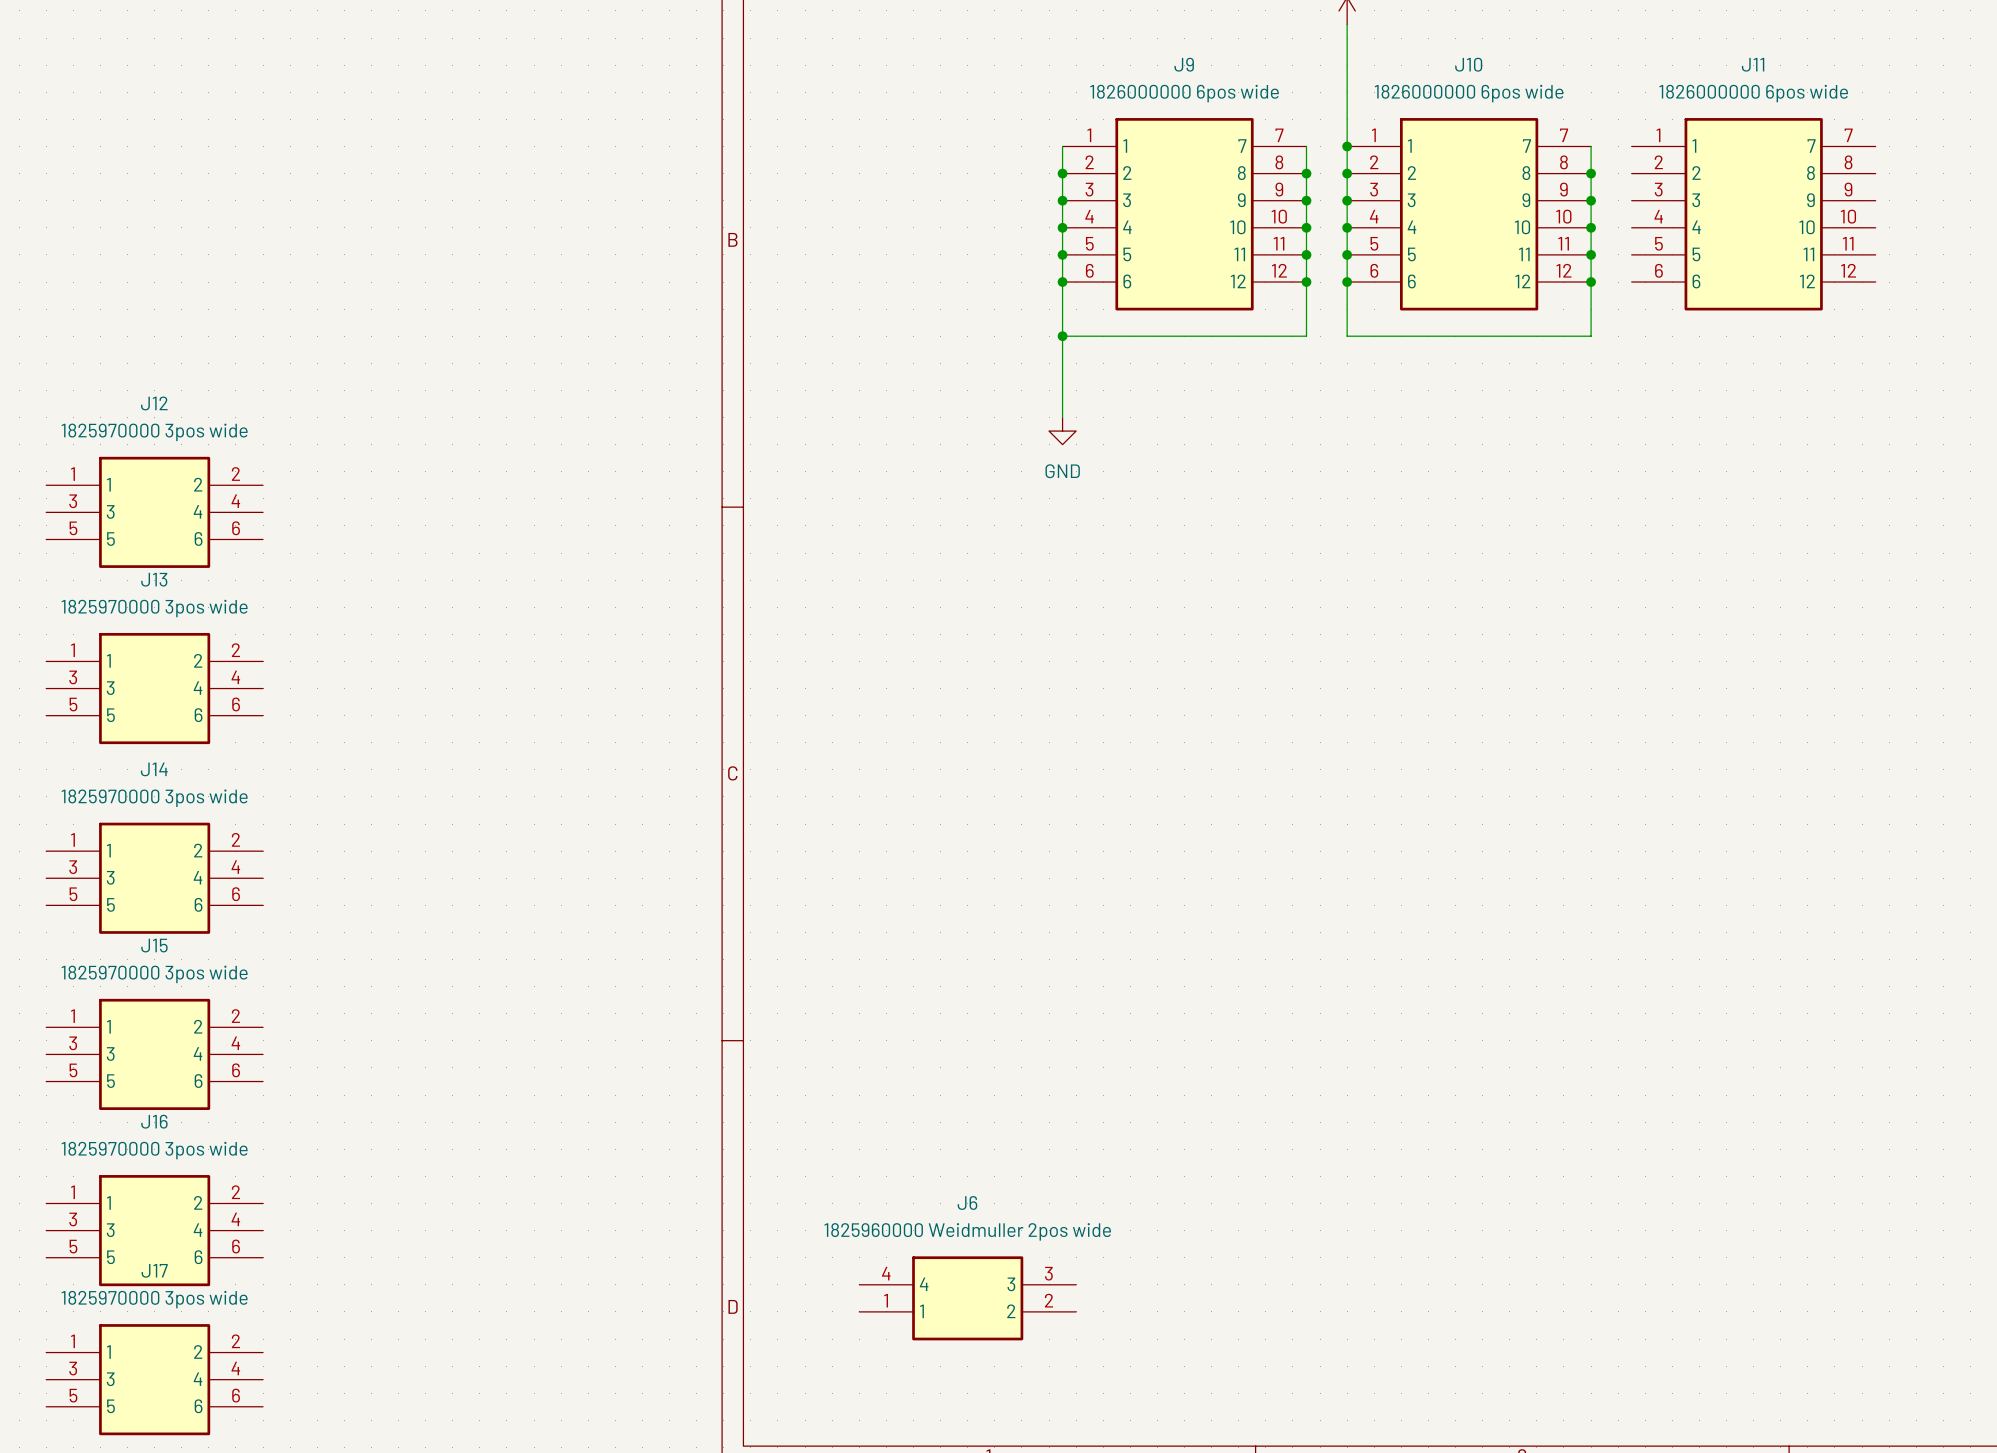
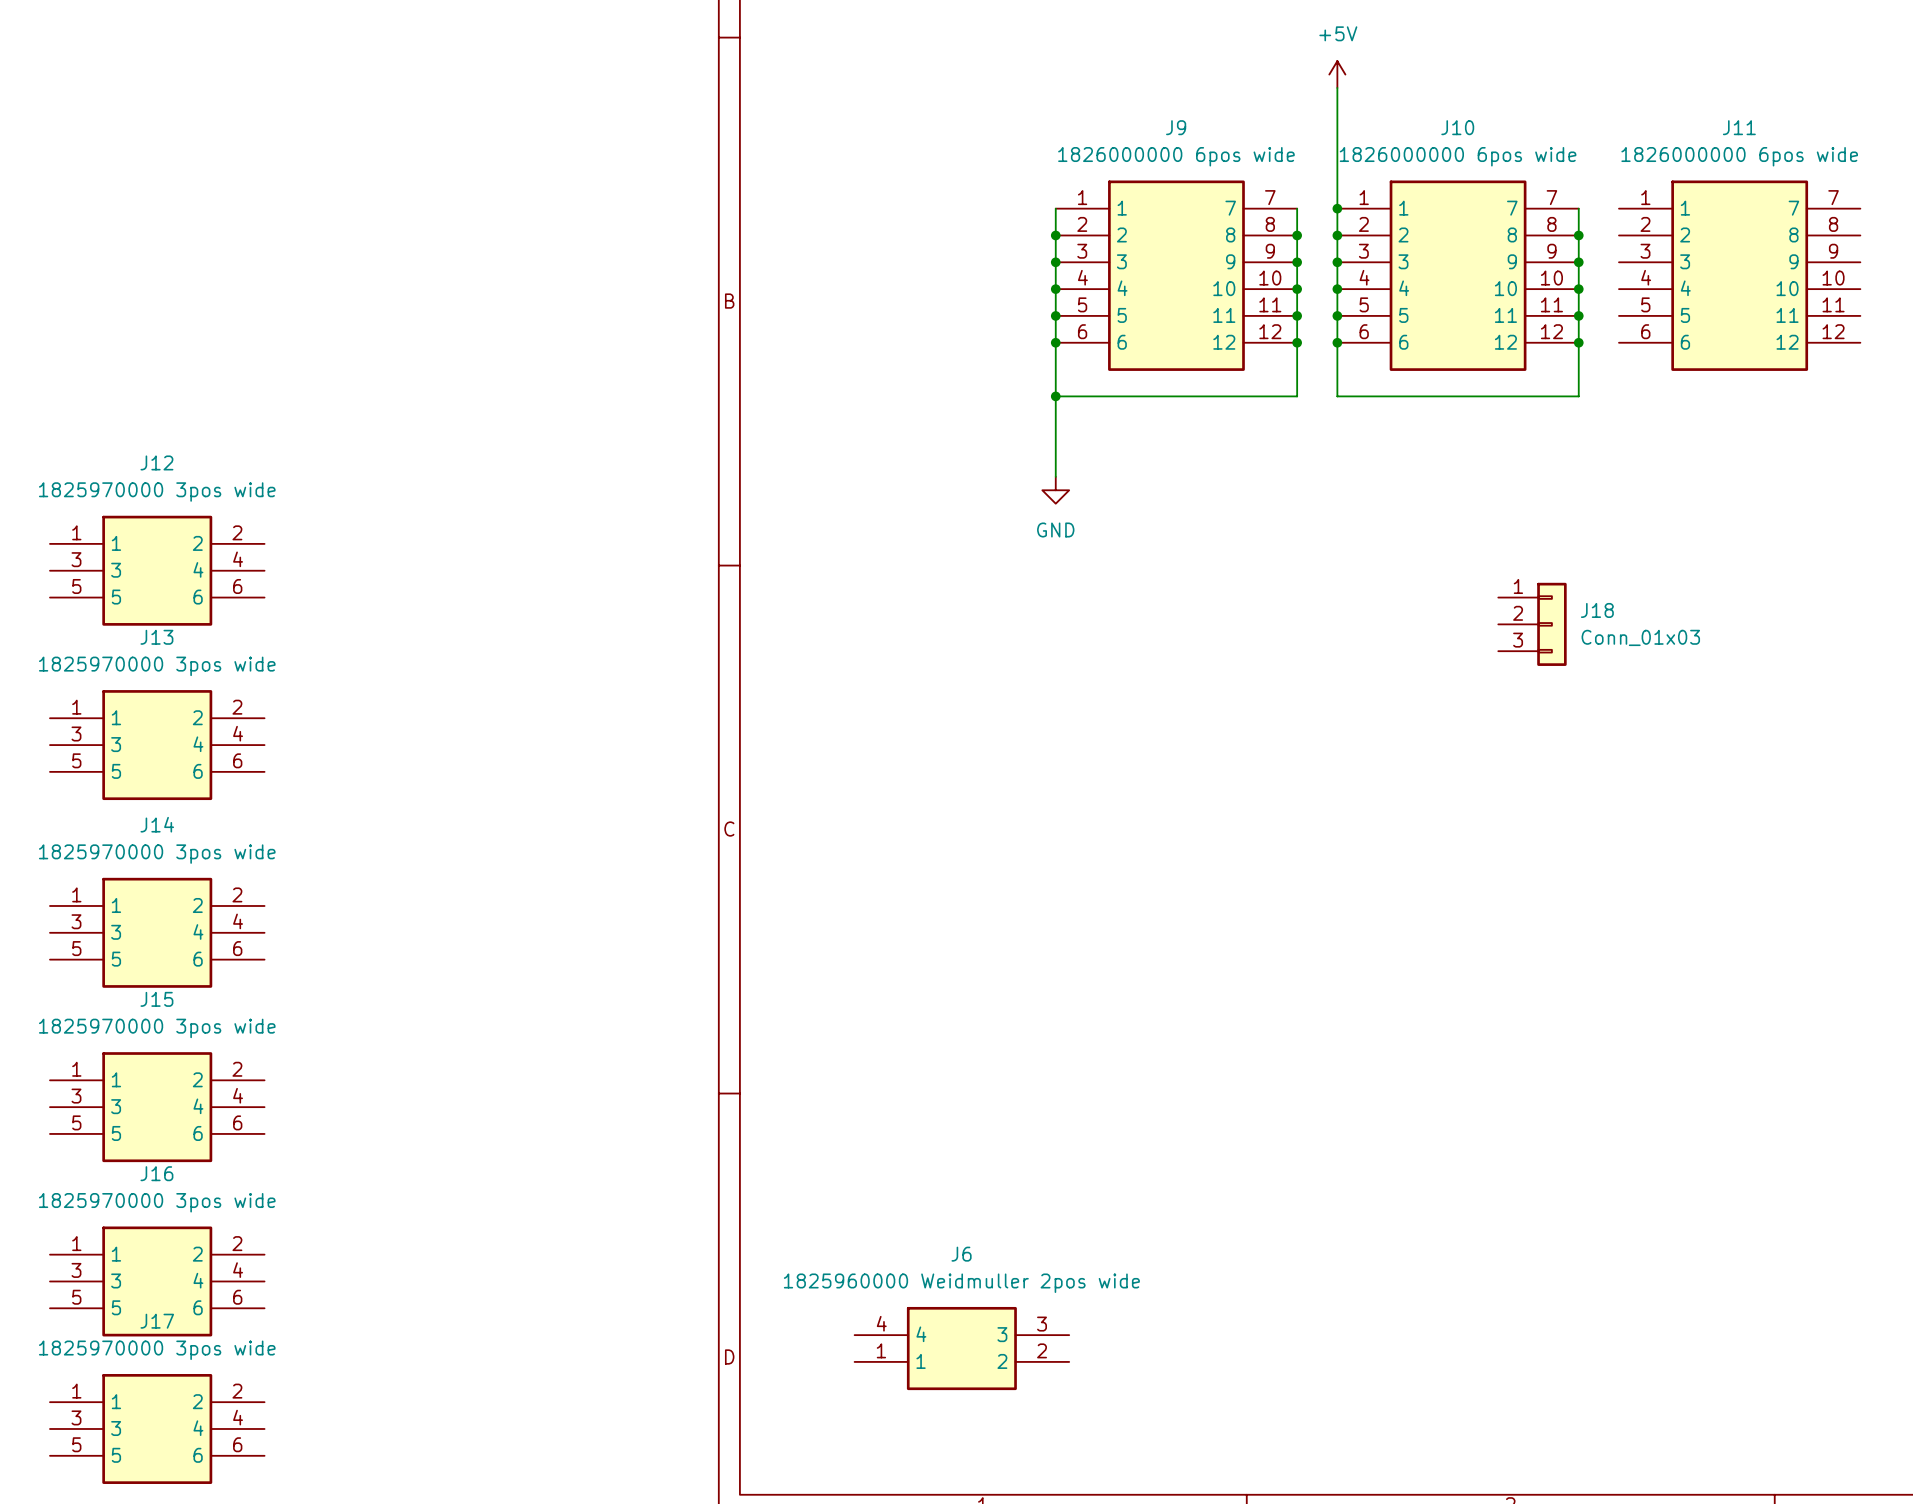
J18: none -> Conn_01x03 (1532, 624)

